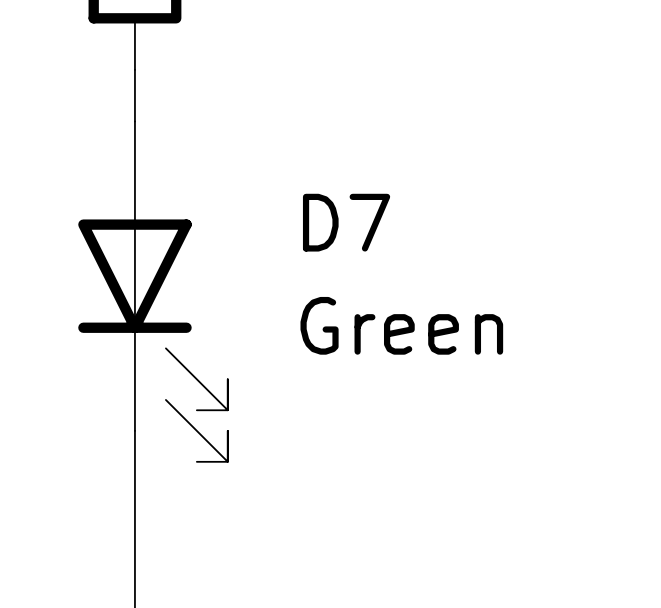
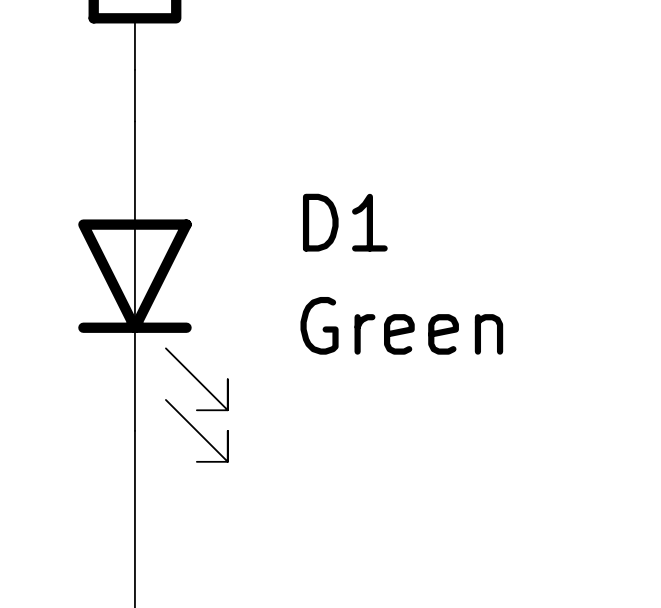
D7 name: D7 (346, 222) -> D1 (345, 222)

